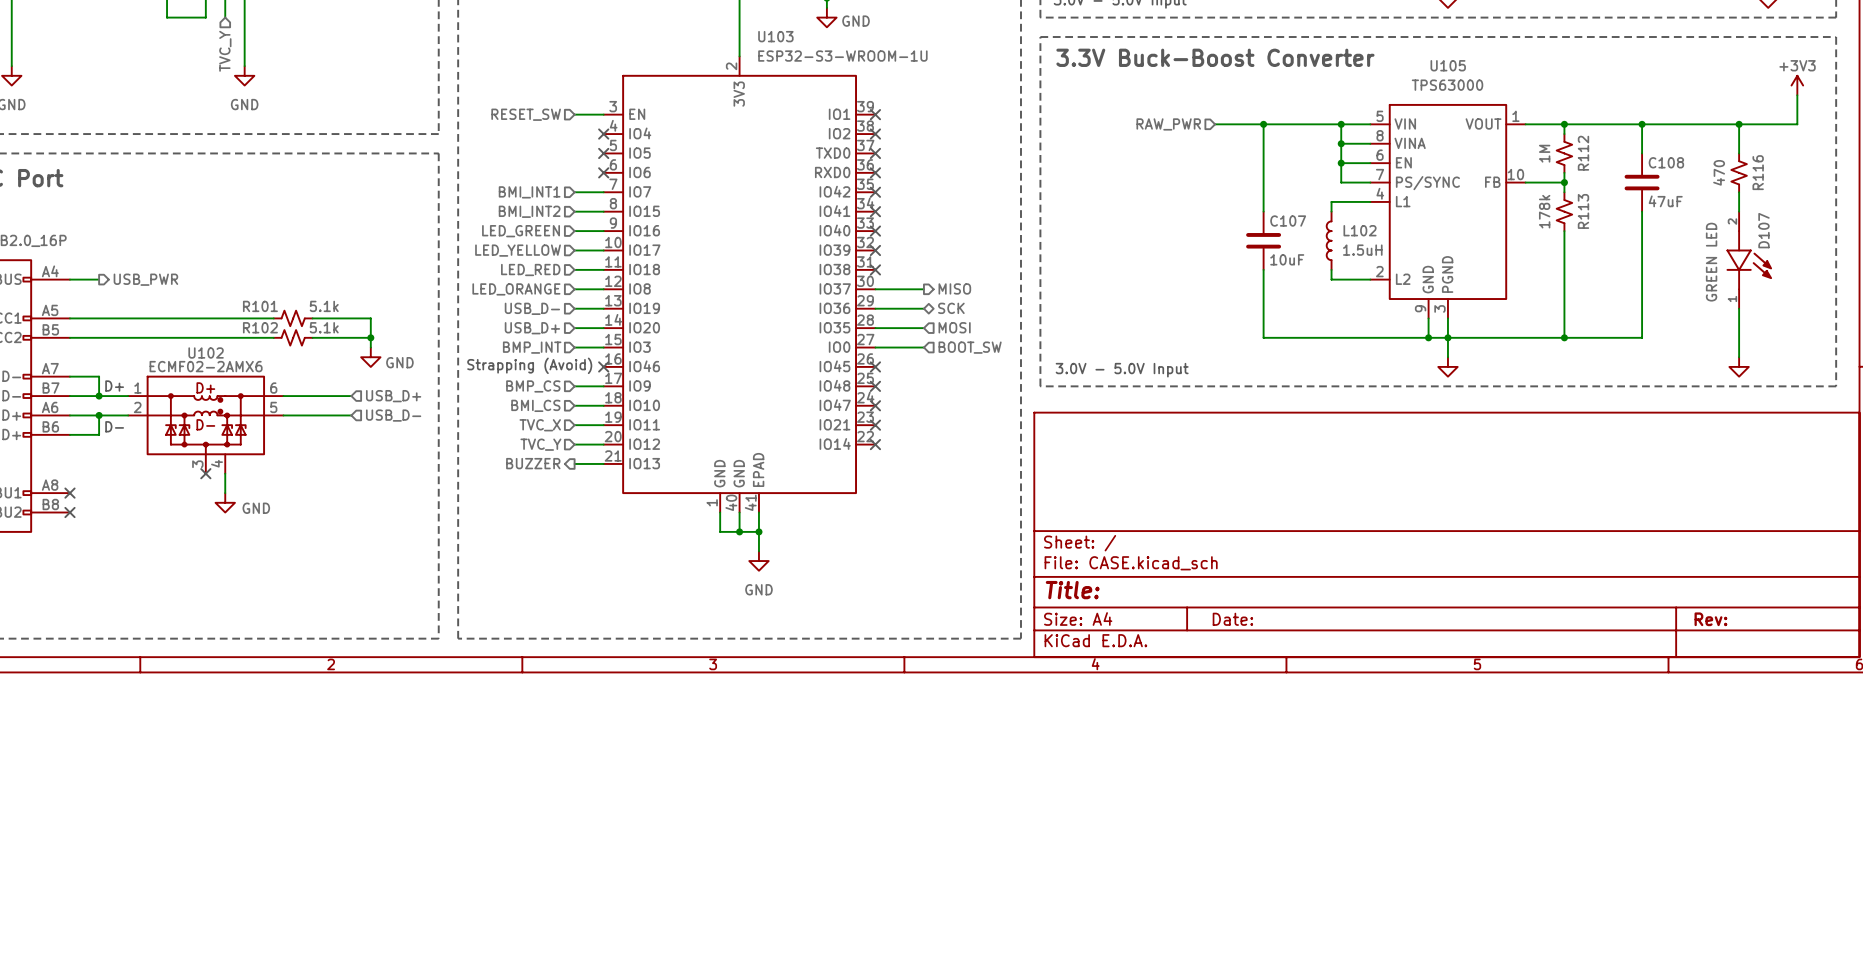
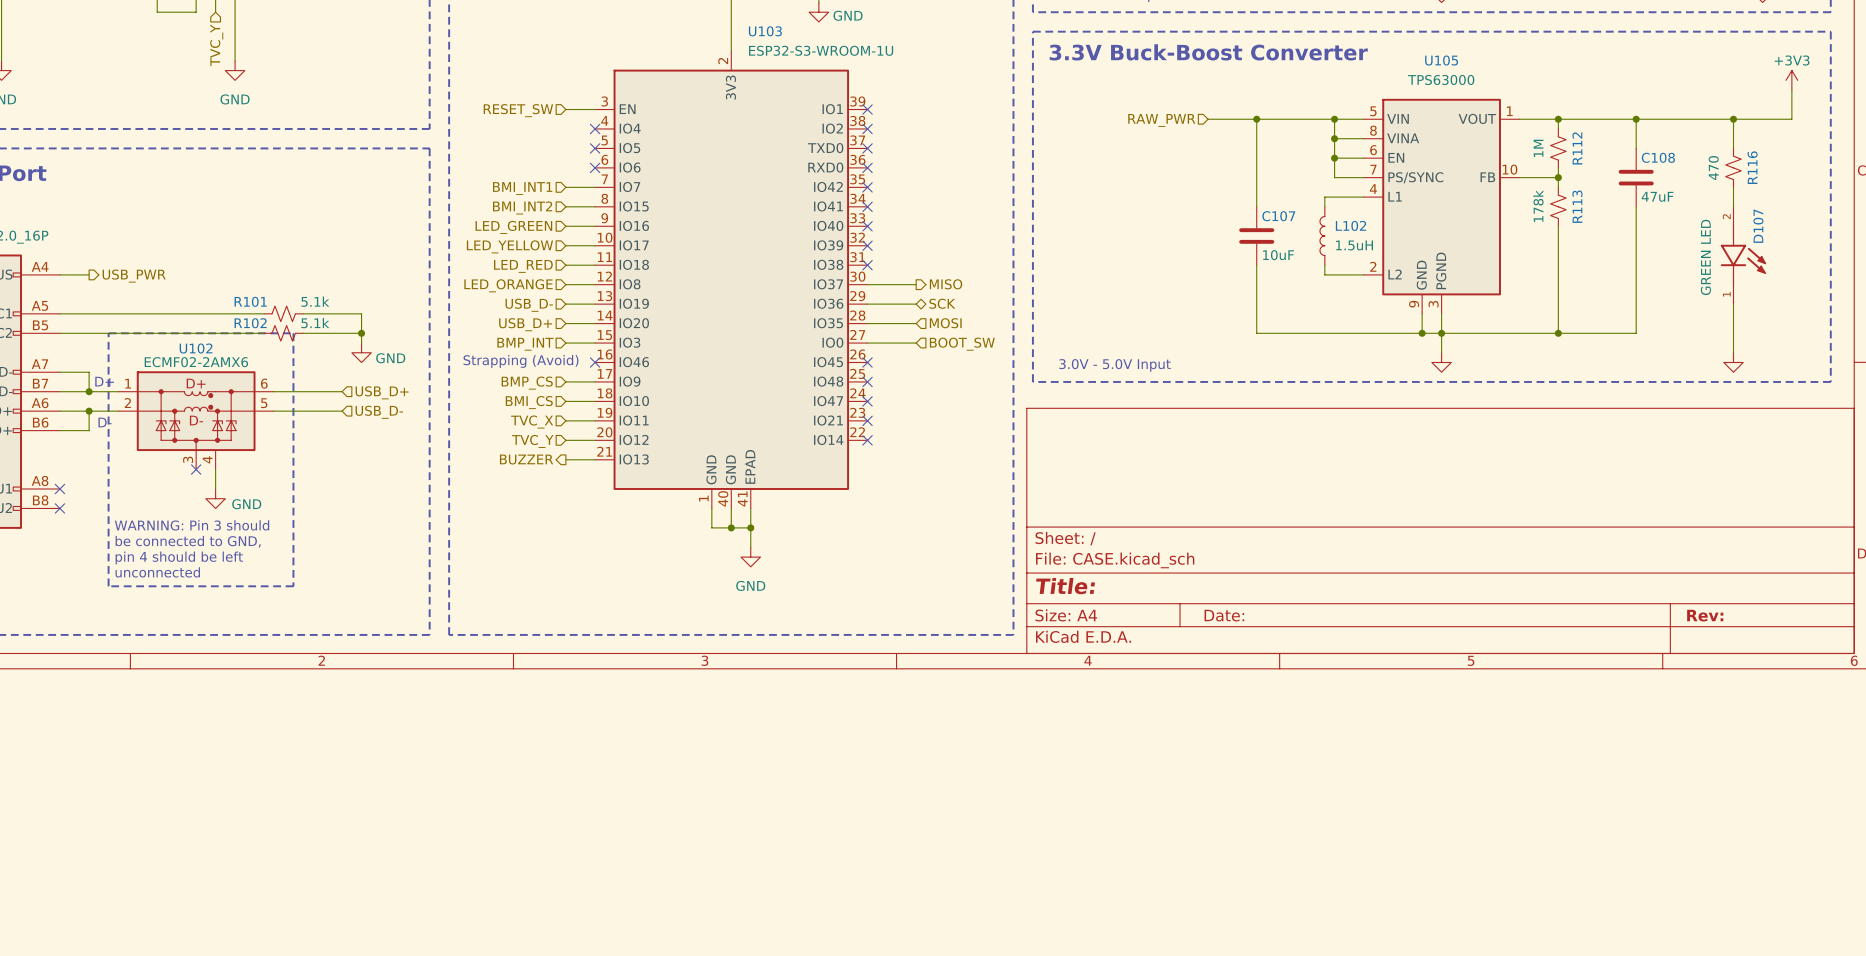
line: none -> (108, 333) (293, 333) (293, 586) (108, 586) (108, 333)
text: none -> WARNING: Pin 3 should (192, 525)
text: none -> be connected to GND, (188, 541)
text: none -> pin 4 should be left (179, 558)
text: none -> unconnected (157, 572)

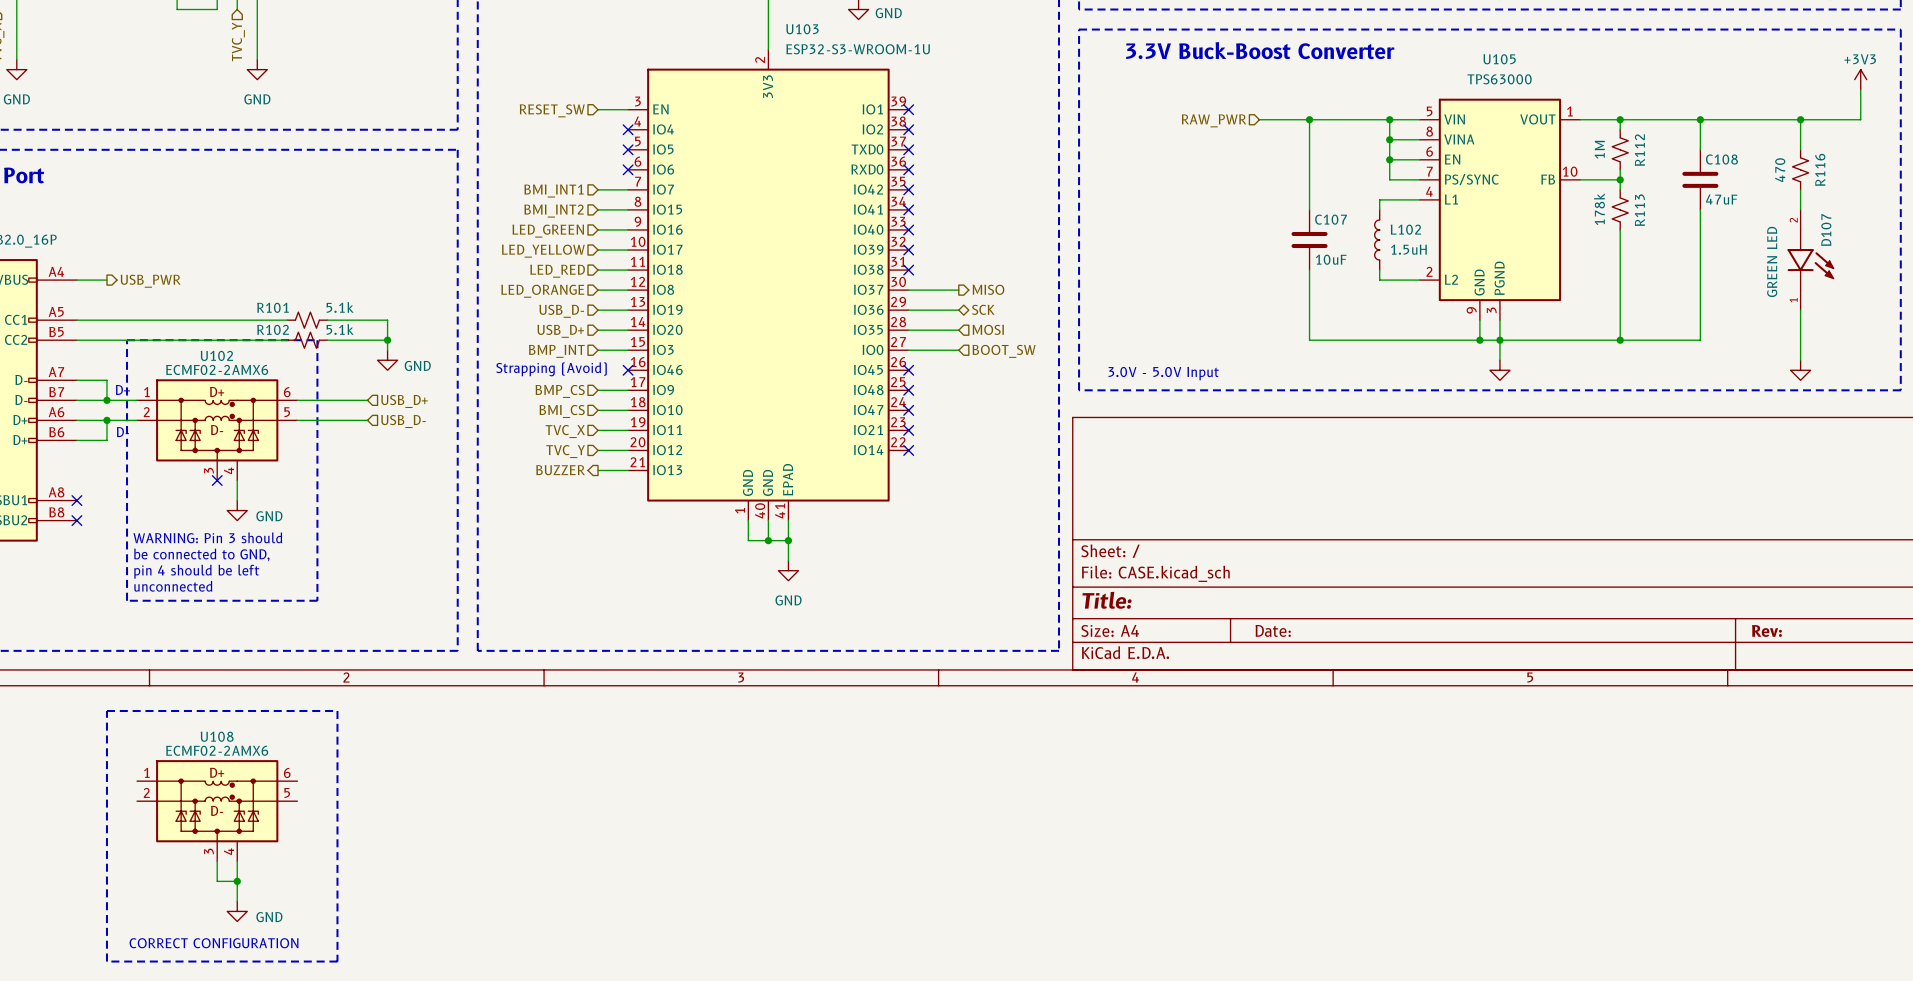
line: none -> (106, 711) (337, 711) (337, 961) (106, 961) (106, 711)
U108: none -> ECMF02-2AMX6 (217, 810)
wire: none -> (217, 861) (217, 881) (237, 881)
wire: none -> (237, 861) (237, 901)
junction: none -> (237, 881)
power symbol: none -> GND (237, 911)
text: none -> CORRECT CONFIGURATION (214, 943)

